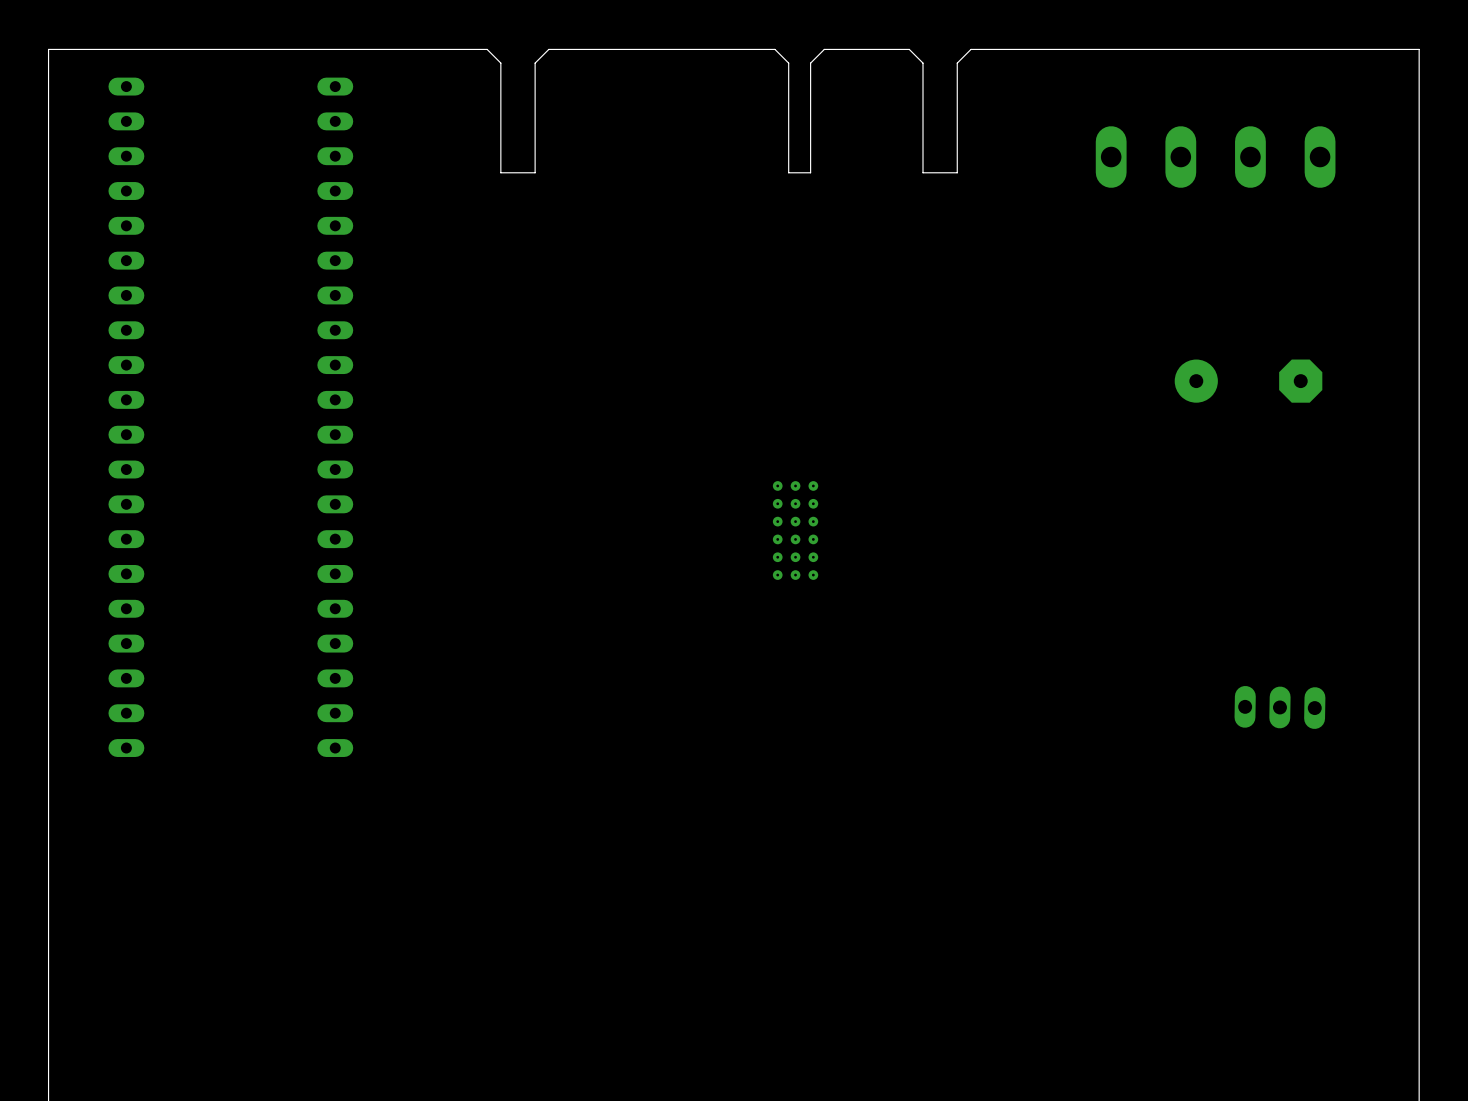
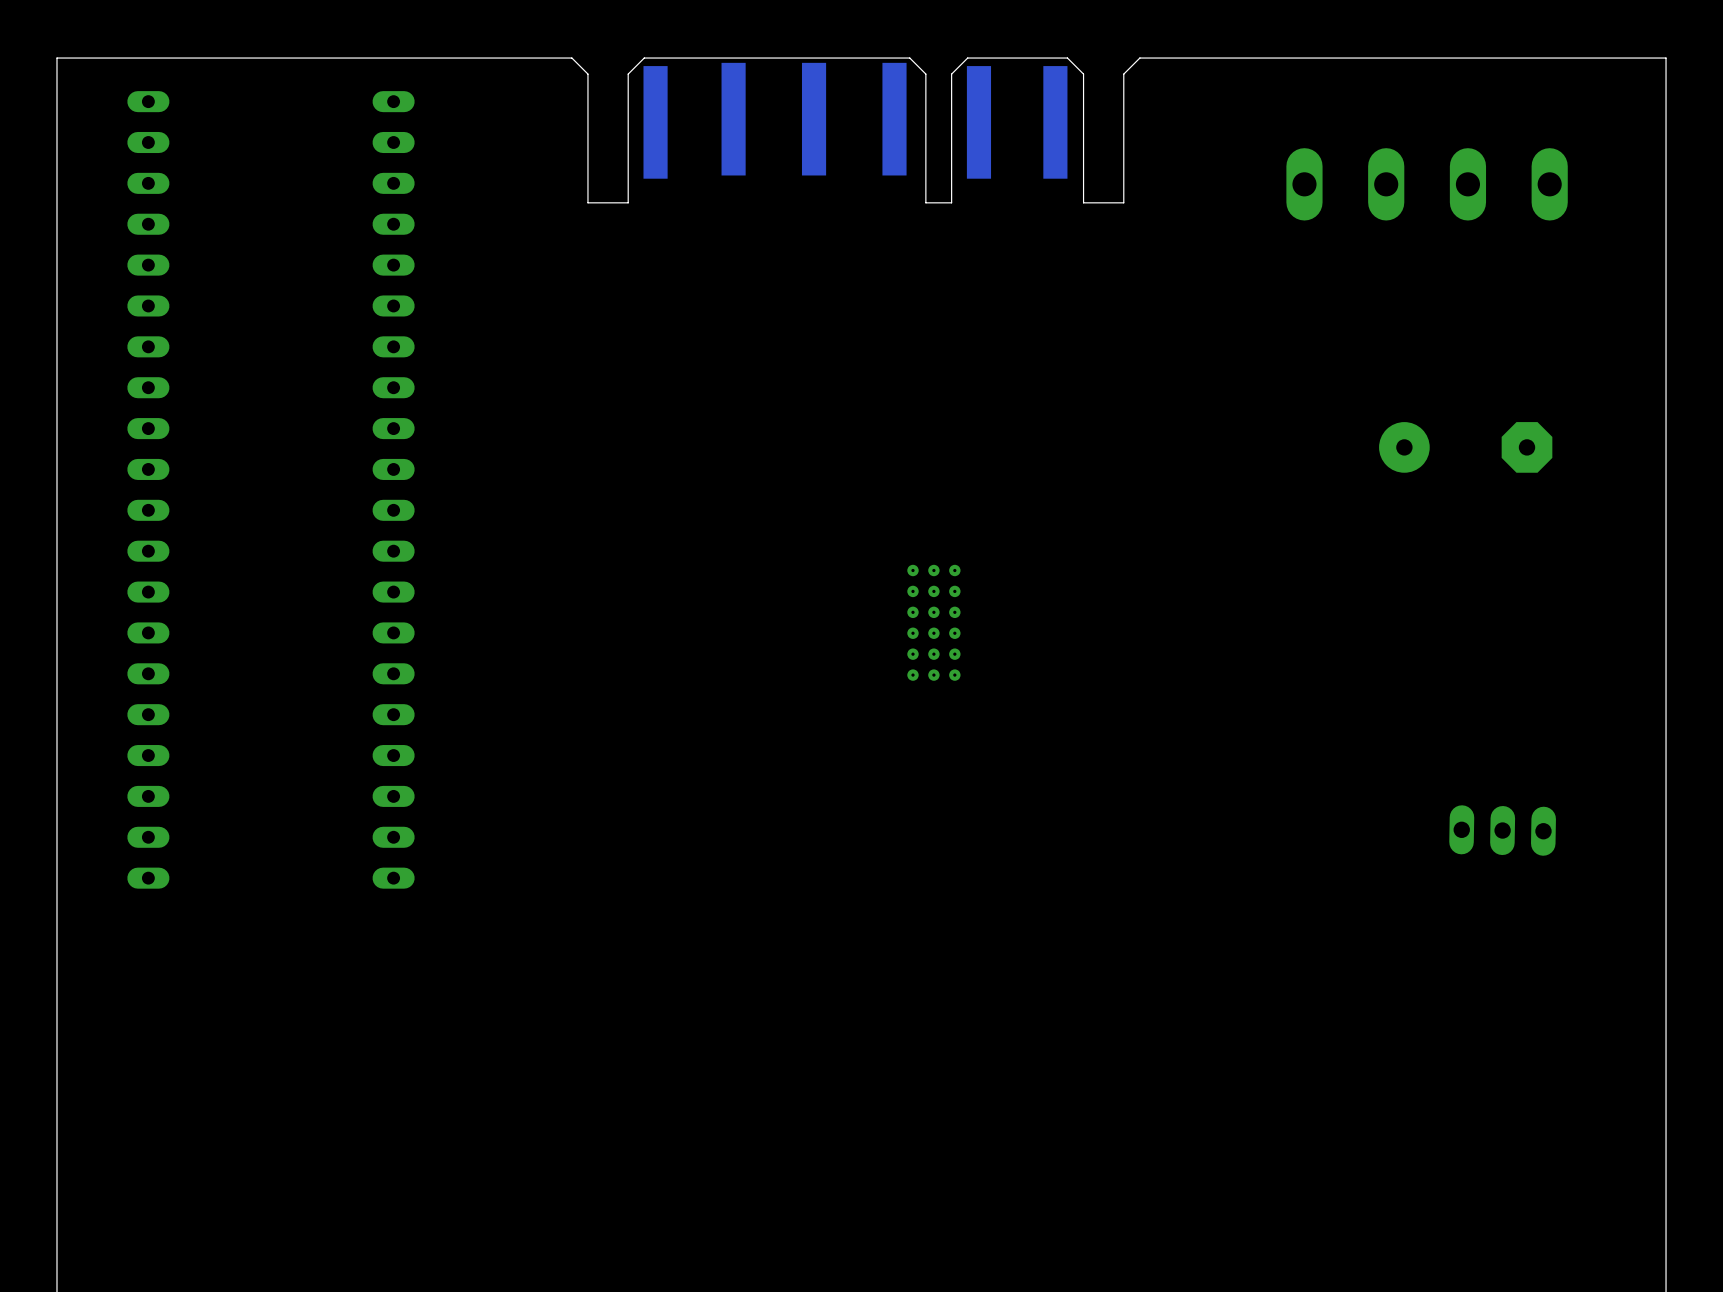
part: none -> (733, 119)
part: none -> (814, 119)
part: none -> (894, 119)
part: none -> (655, 122)
part: none -> (978, 122)
part: none -> (1055, 122)

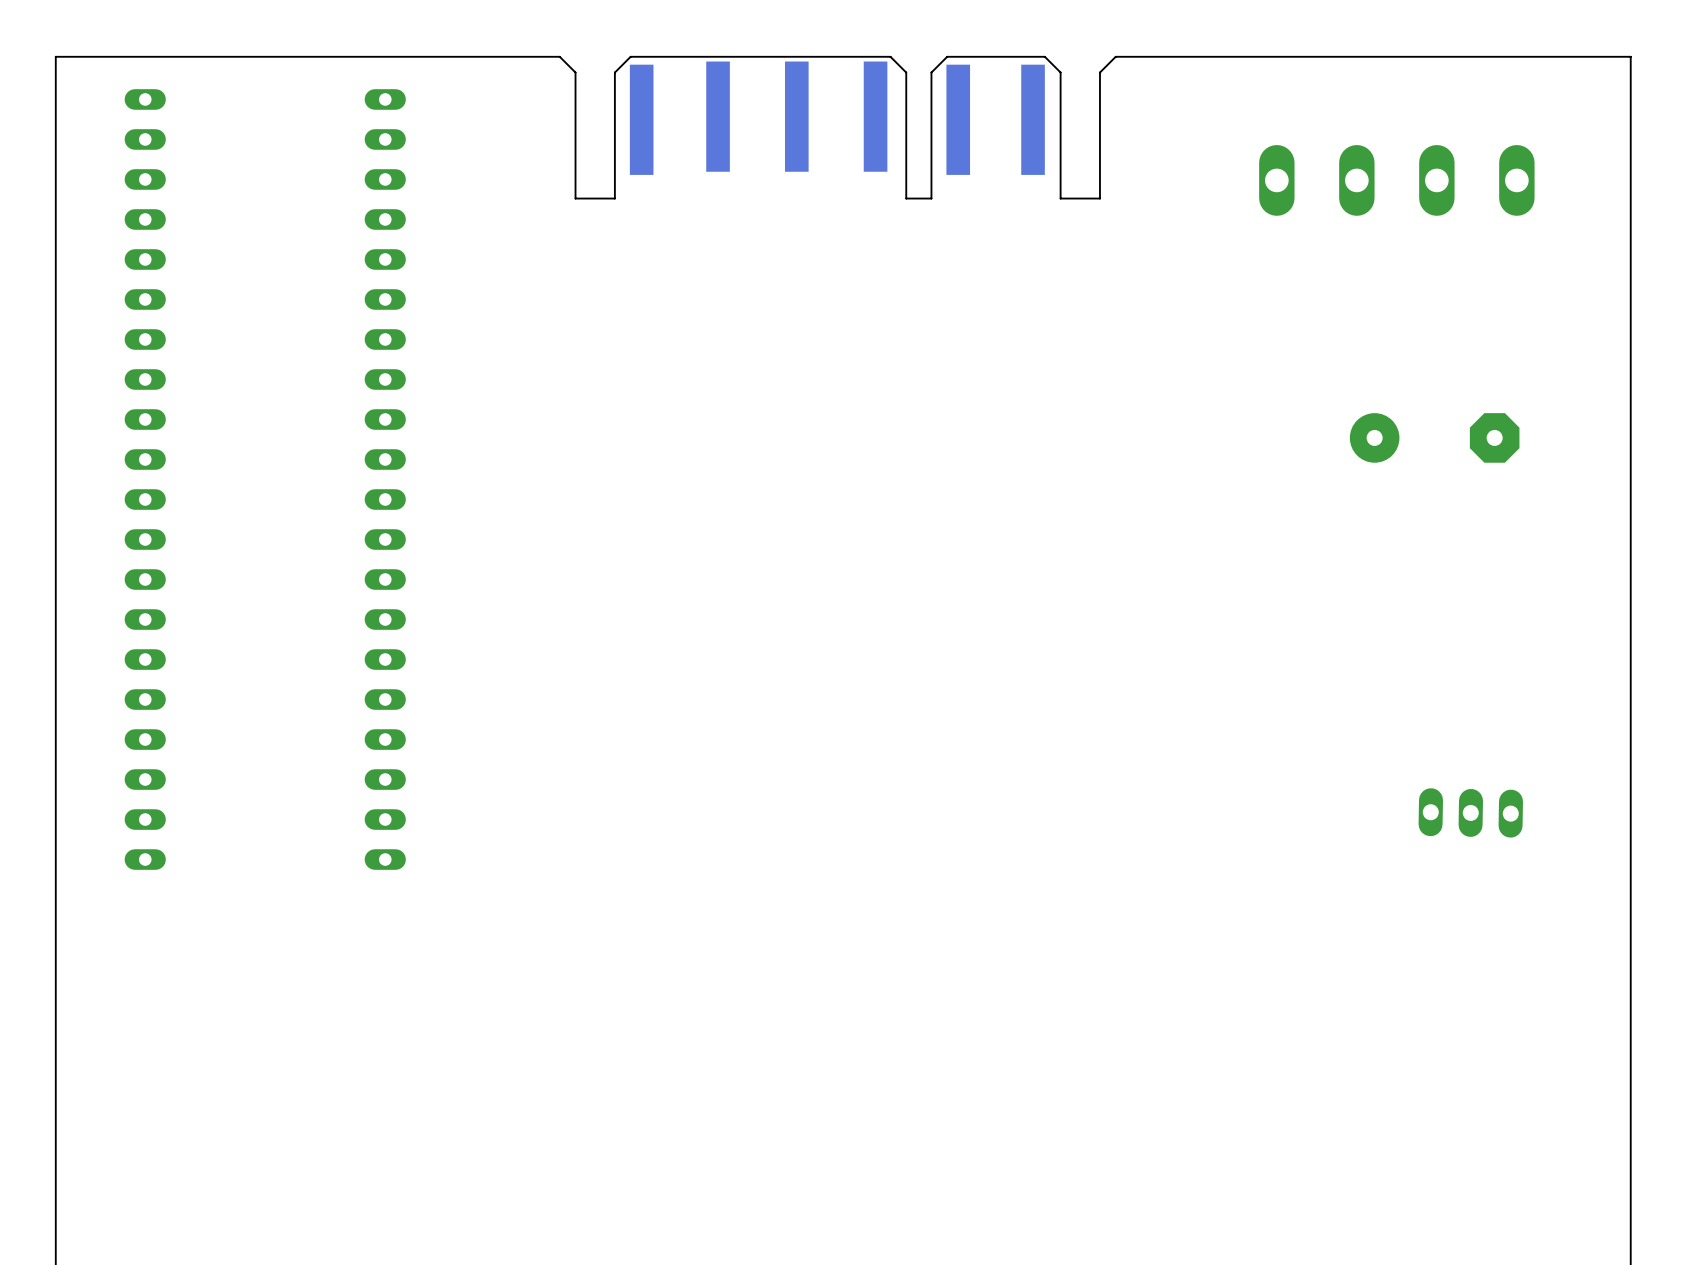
part: (933, 622) -> none

